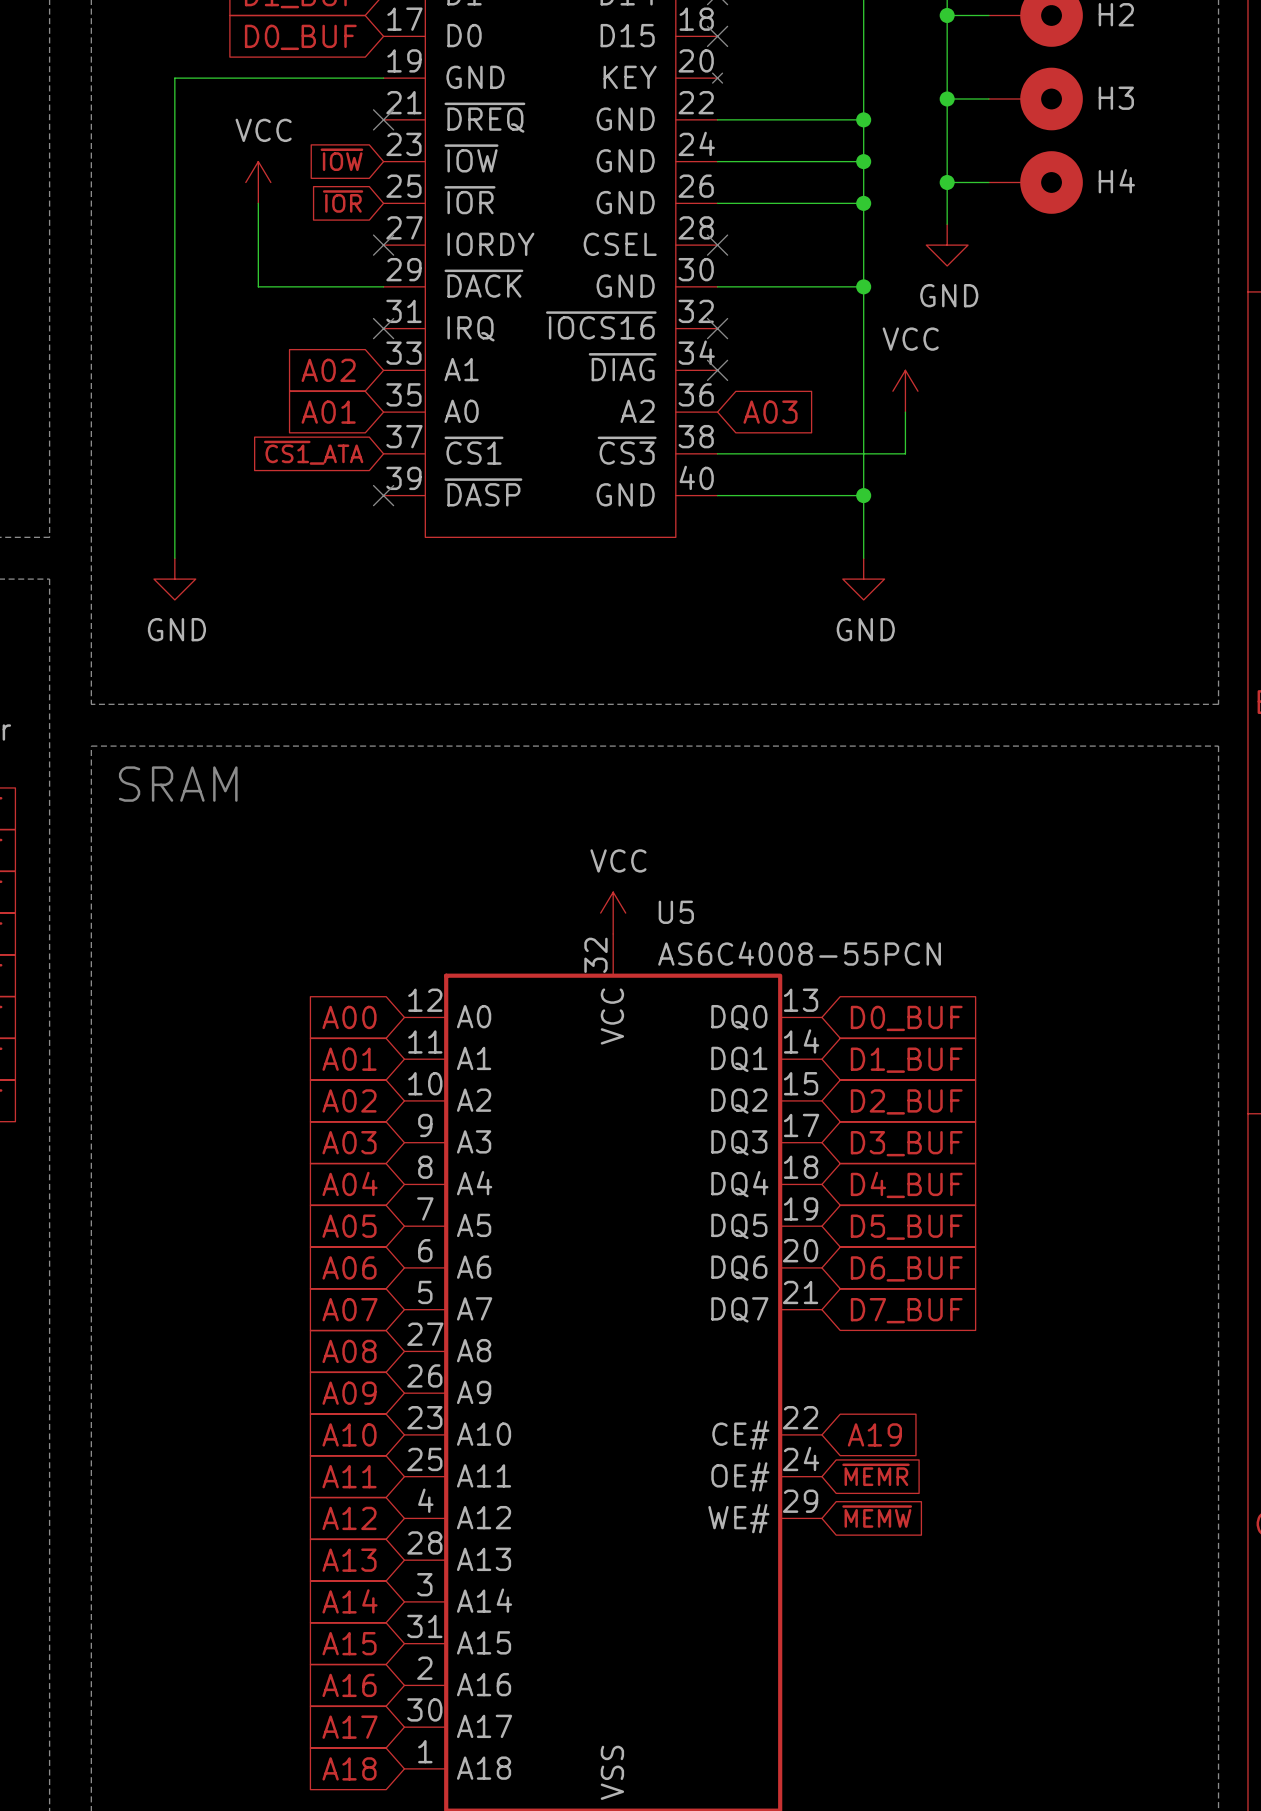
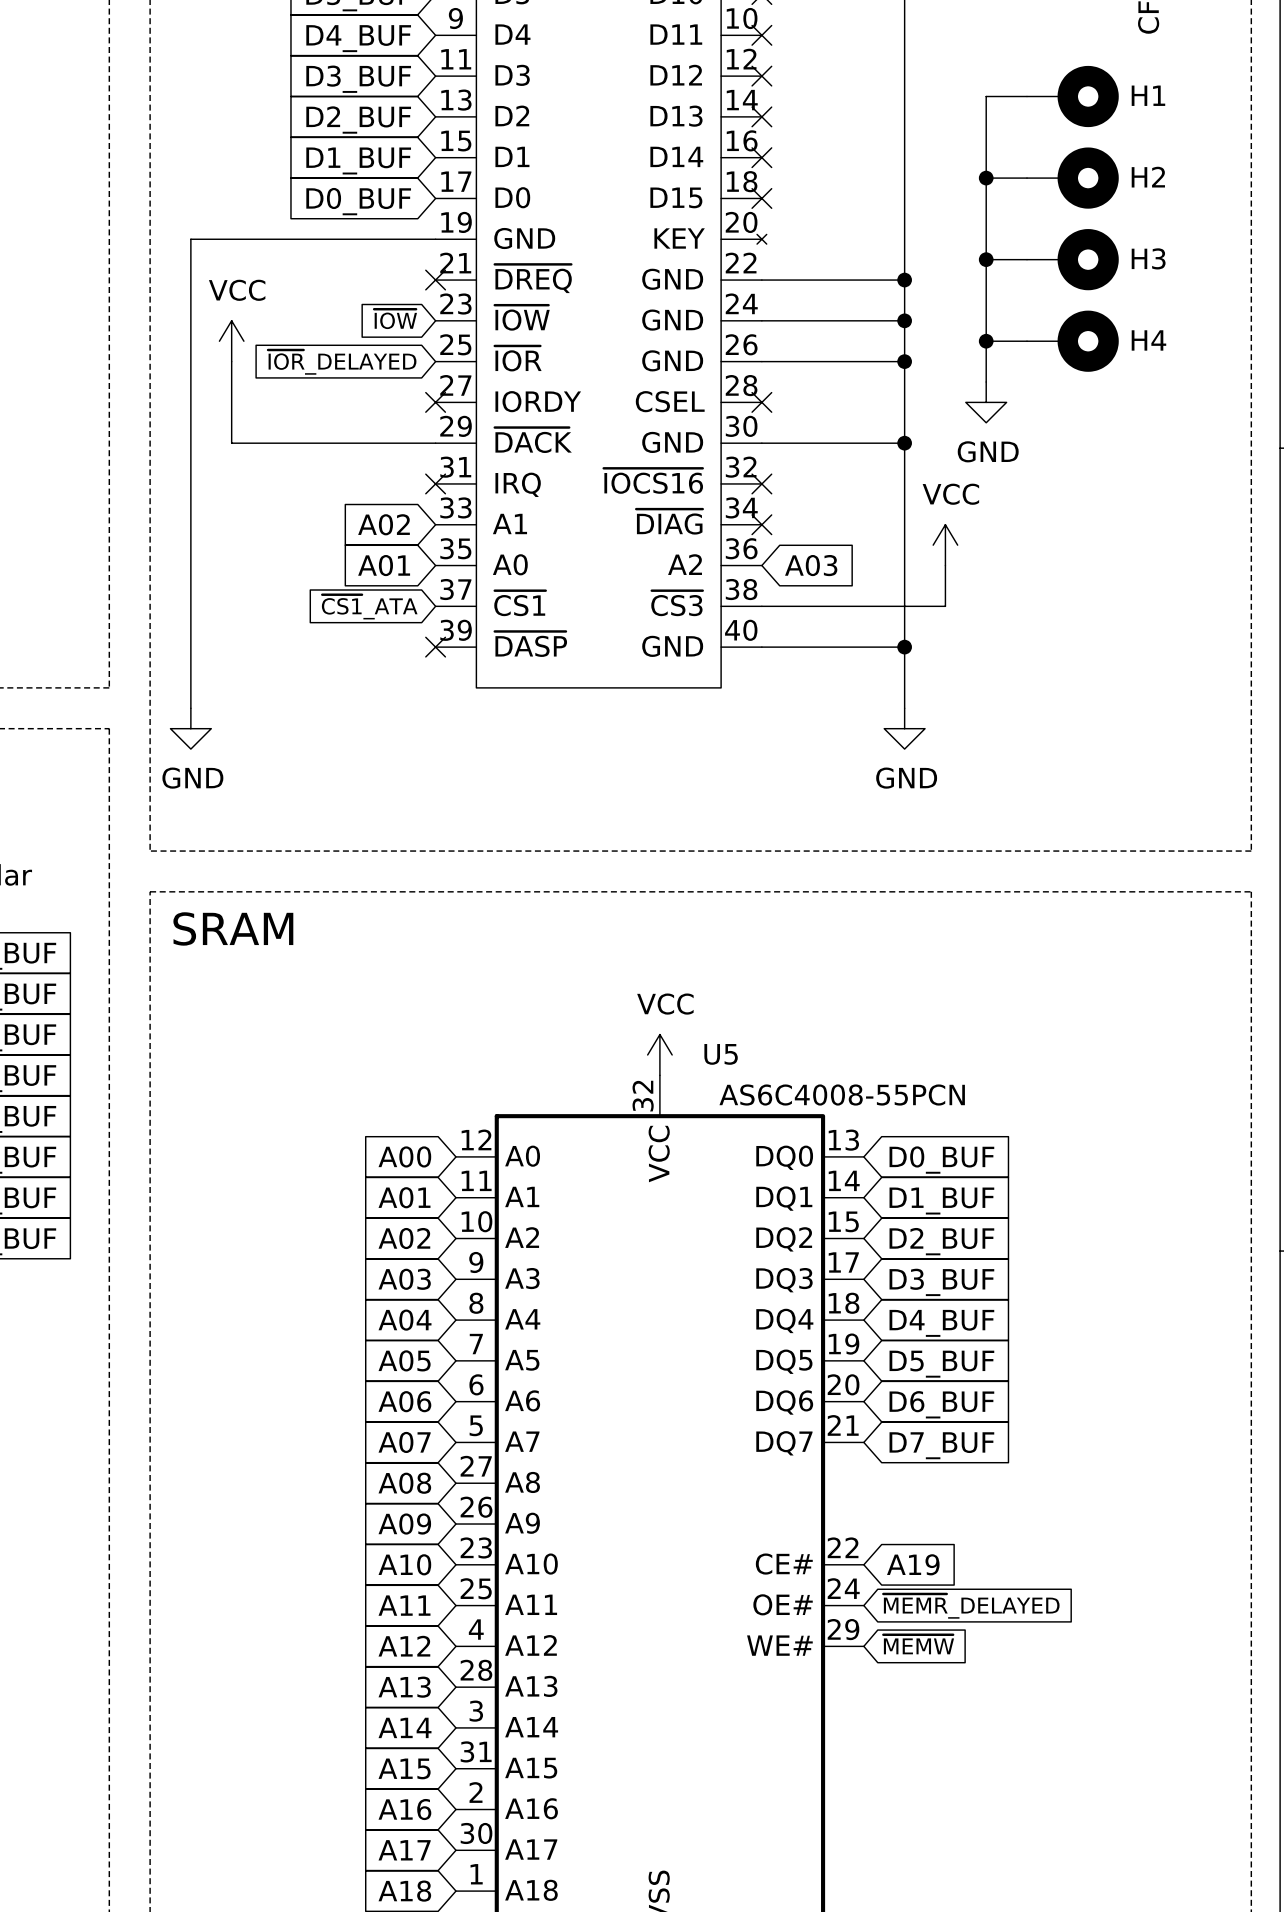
wire: (174, 78) (174, 203) -> (231, 239) (190, 239) (190, 708)
power symbol position: VCC (258, 182) -> VCC (231, 341)
global label: ~{IOR} (343, 201) -> ~{IOR}_DELAYED (342, 362)
wire: (258, 203) (258, 286) -> (231, 443) (313, 443)
wire: (174, 286) (174, 558) -> none
power symbol position: GND (174, 579) -> GND (190, 728)
global label: ~{MEMR} (876, 1474) -> ~{MEMR}_DELAYED (971, 1606)

